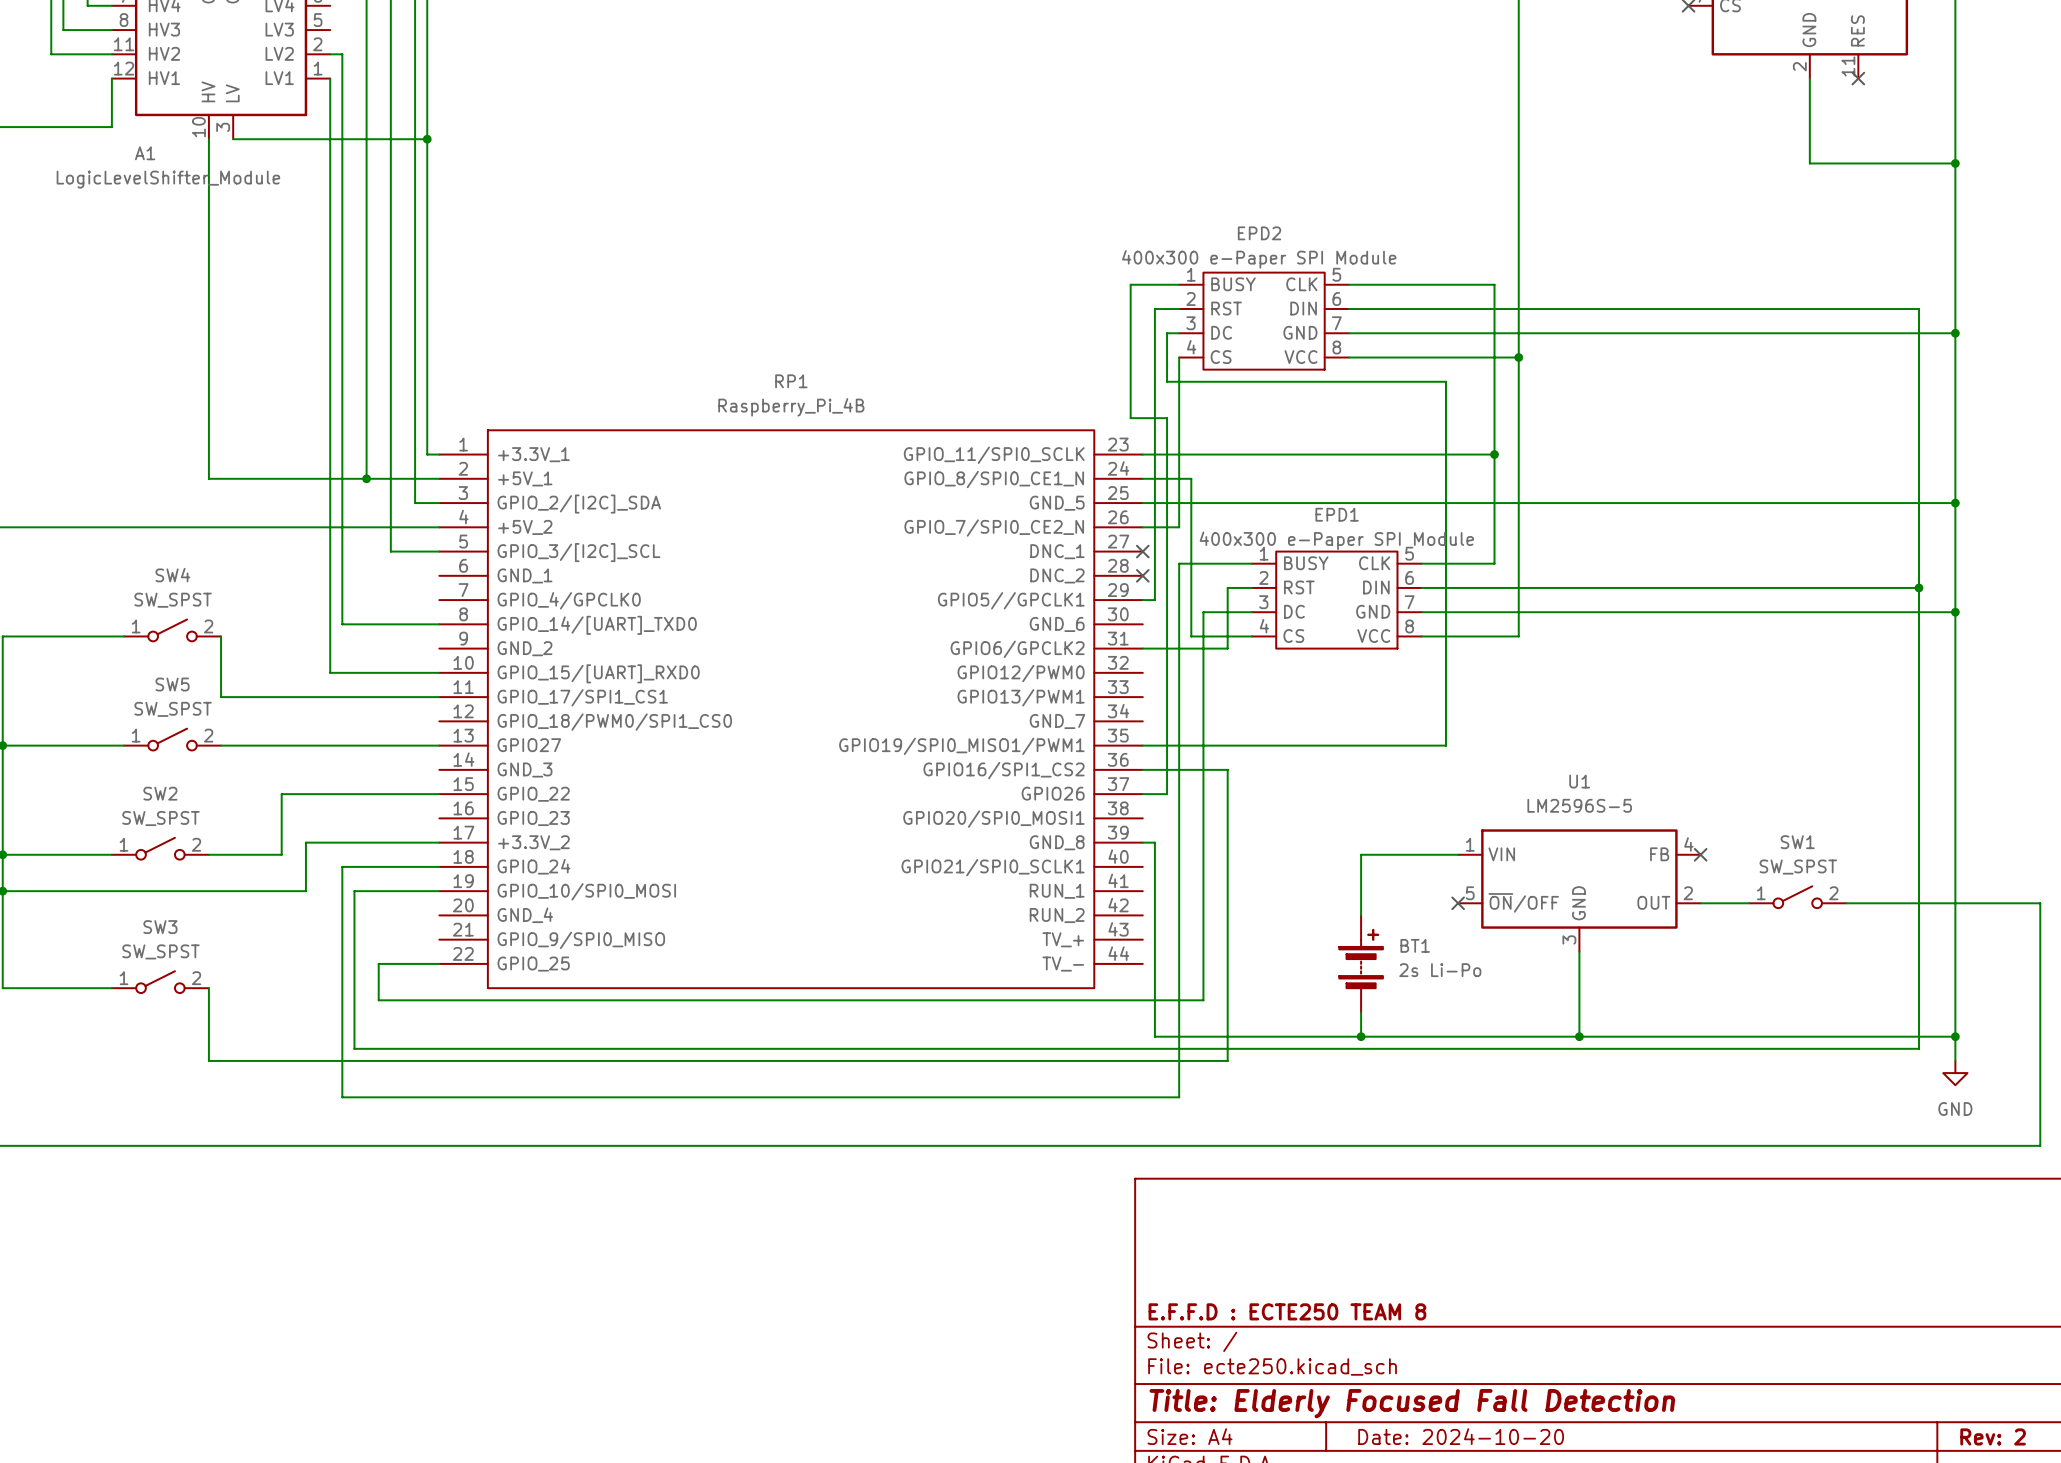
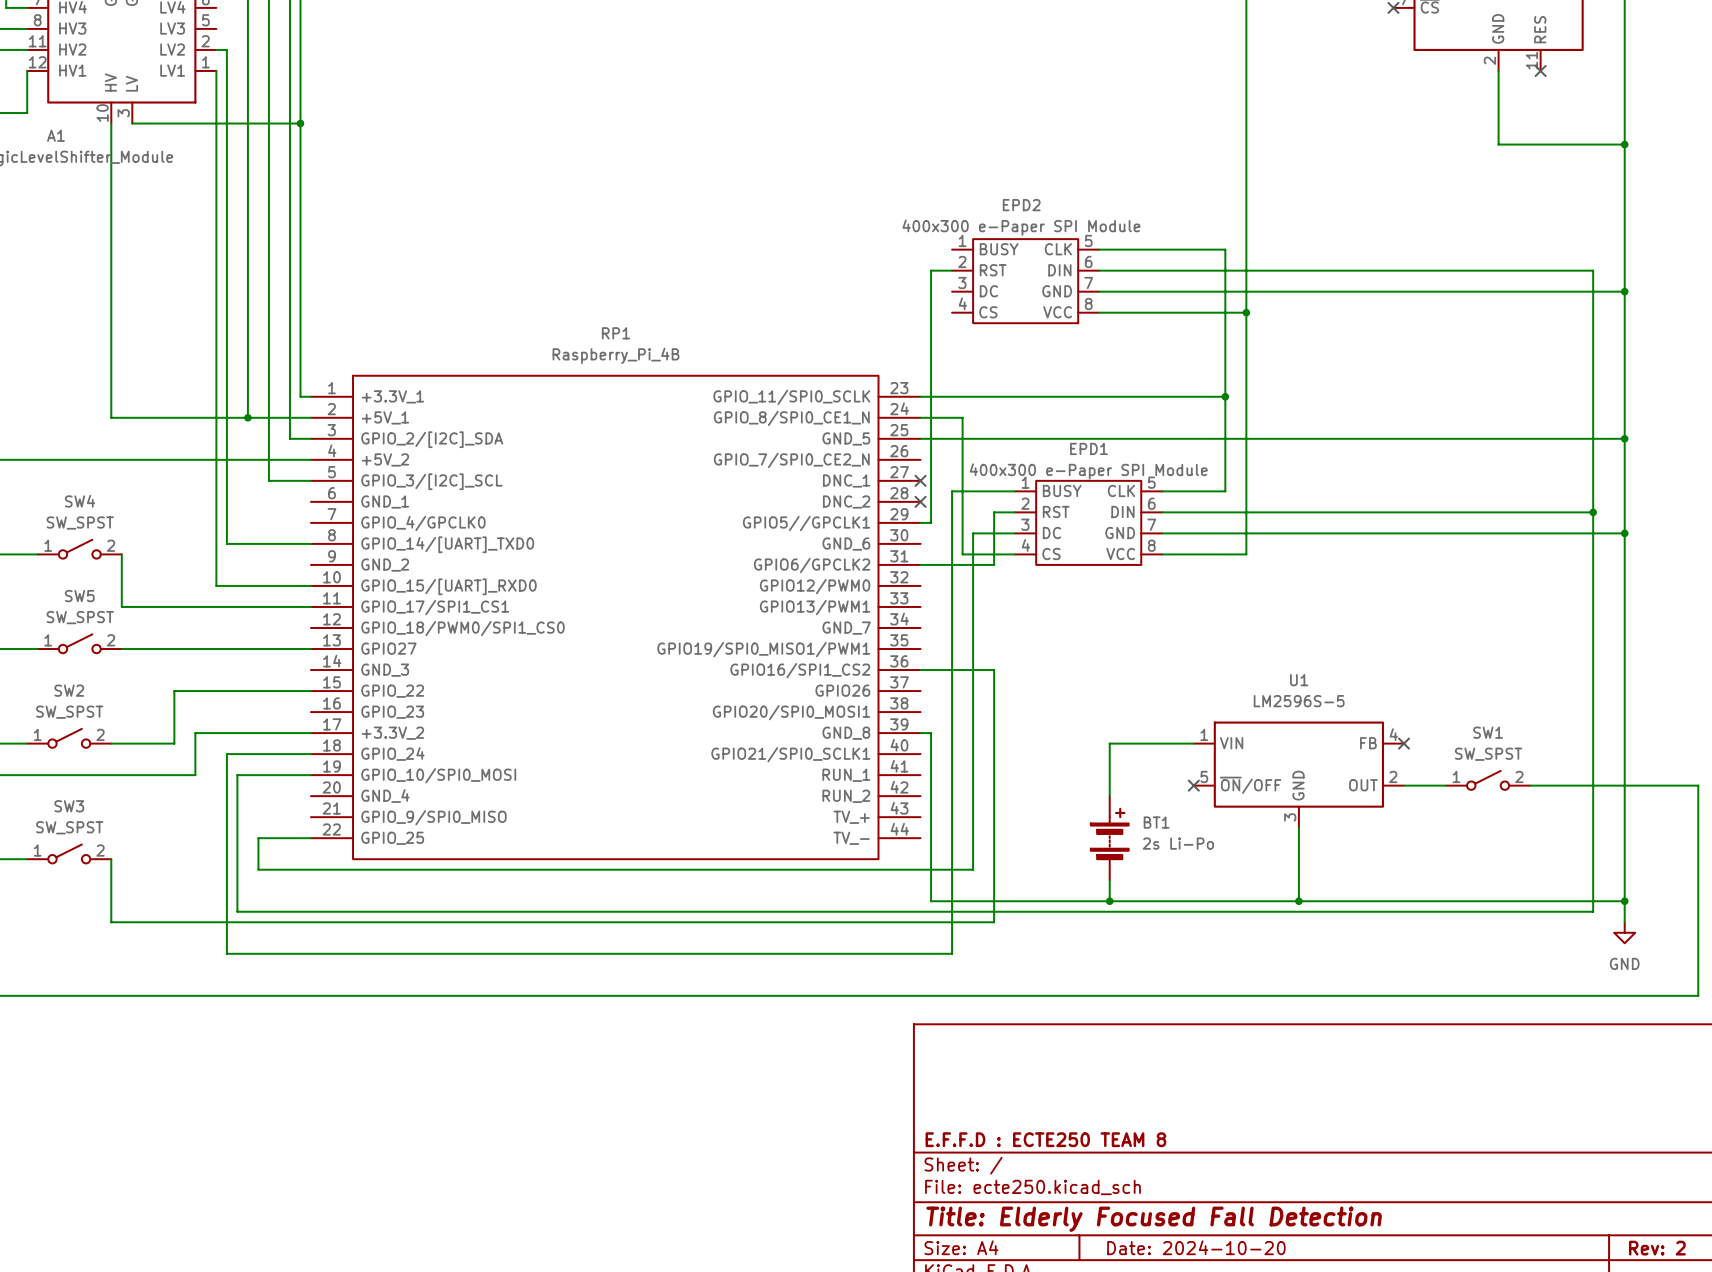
wire: (1179, 284) (1130, 284) (1130, 418) (1167, 418) (1167, 794) (1142, 794) -> none
wire: (1179, 333) (1167, 333) (1167, 381) (1445, 381) (1445, 745) (1142, 745) -> none
wire: (1179, 357) (1179, 527) (1142, 527) -> none

